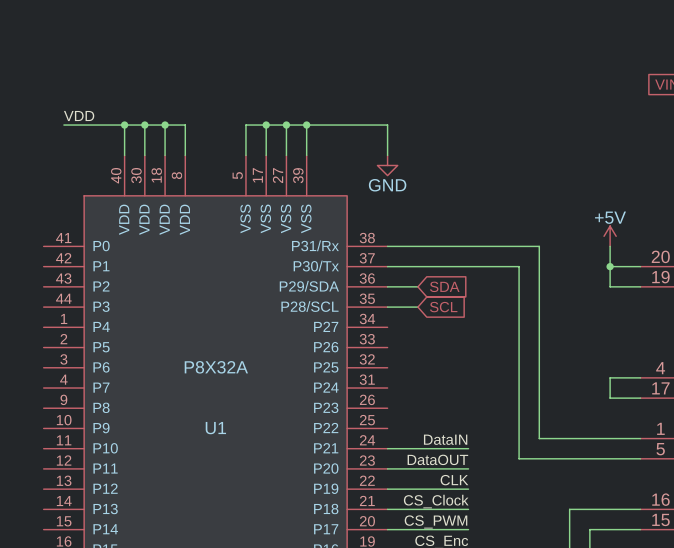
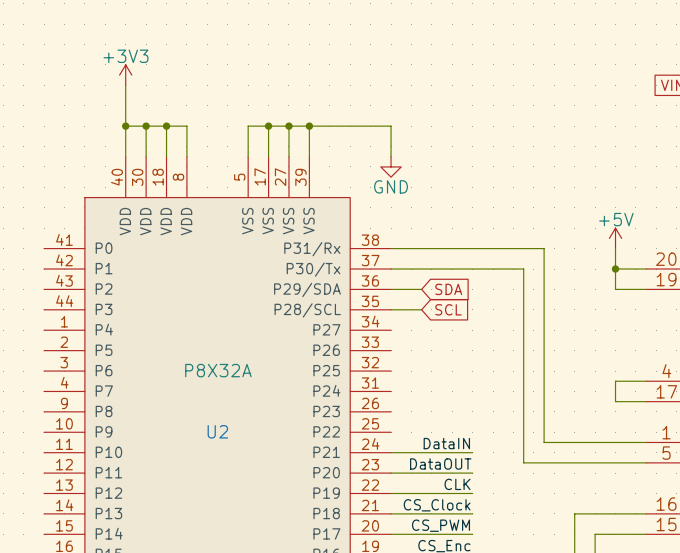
power symbol: none -> +3V3 (125, 75)
label: VDD (79, 116) -> none
wire: (63, 125) (124, 125) -> (125, 85) (125, 126)
U1 name: U1 (215, 428) -> U2 (217, 431)

